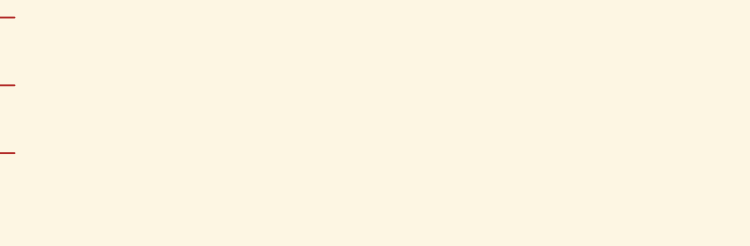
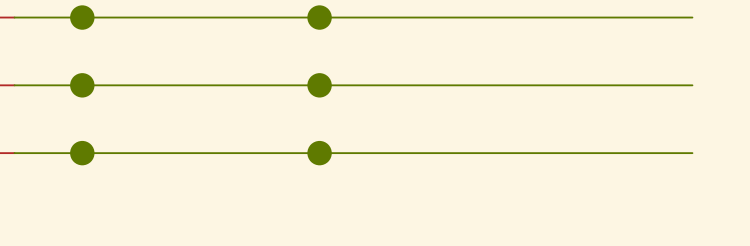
wire: none -> (14, 17) (692, 17)
junction: none -> (82, 17)
junction: none -> (319, 17)
wire: none -> (14, 85) (692, 85)
junction: none -> (82, 85)
junction: none -> (319, 85)
wire: none -> (14, 153) (692, 153)
junction: none -> (82, 153)
junction: none -> (319, 153)

